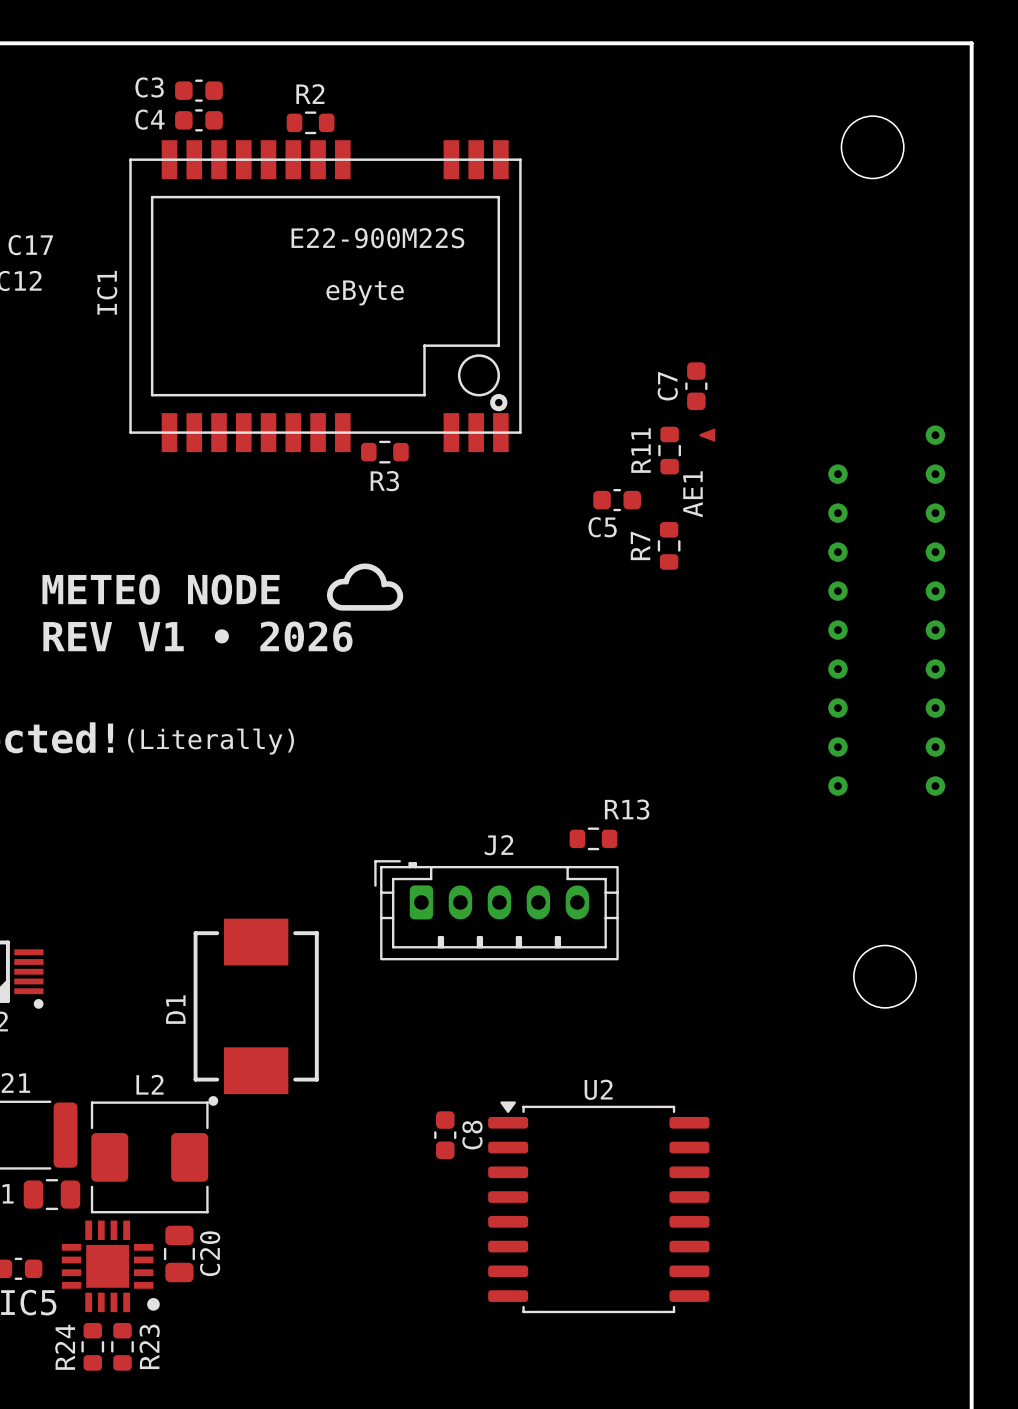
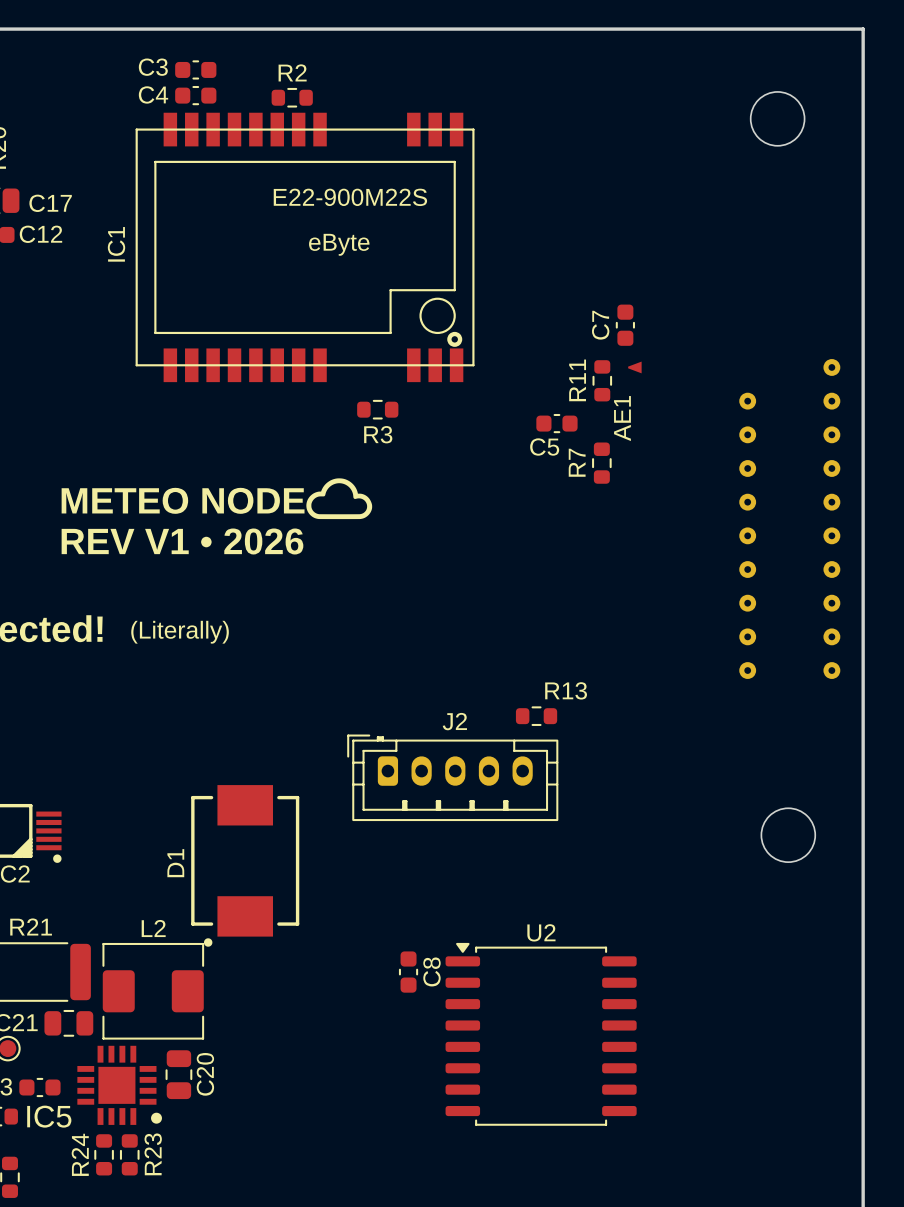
R3 position: (384, 452) -> (377, 409)

